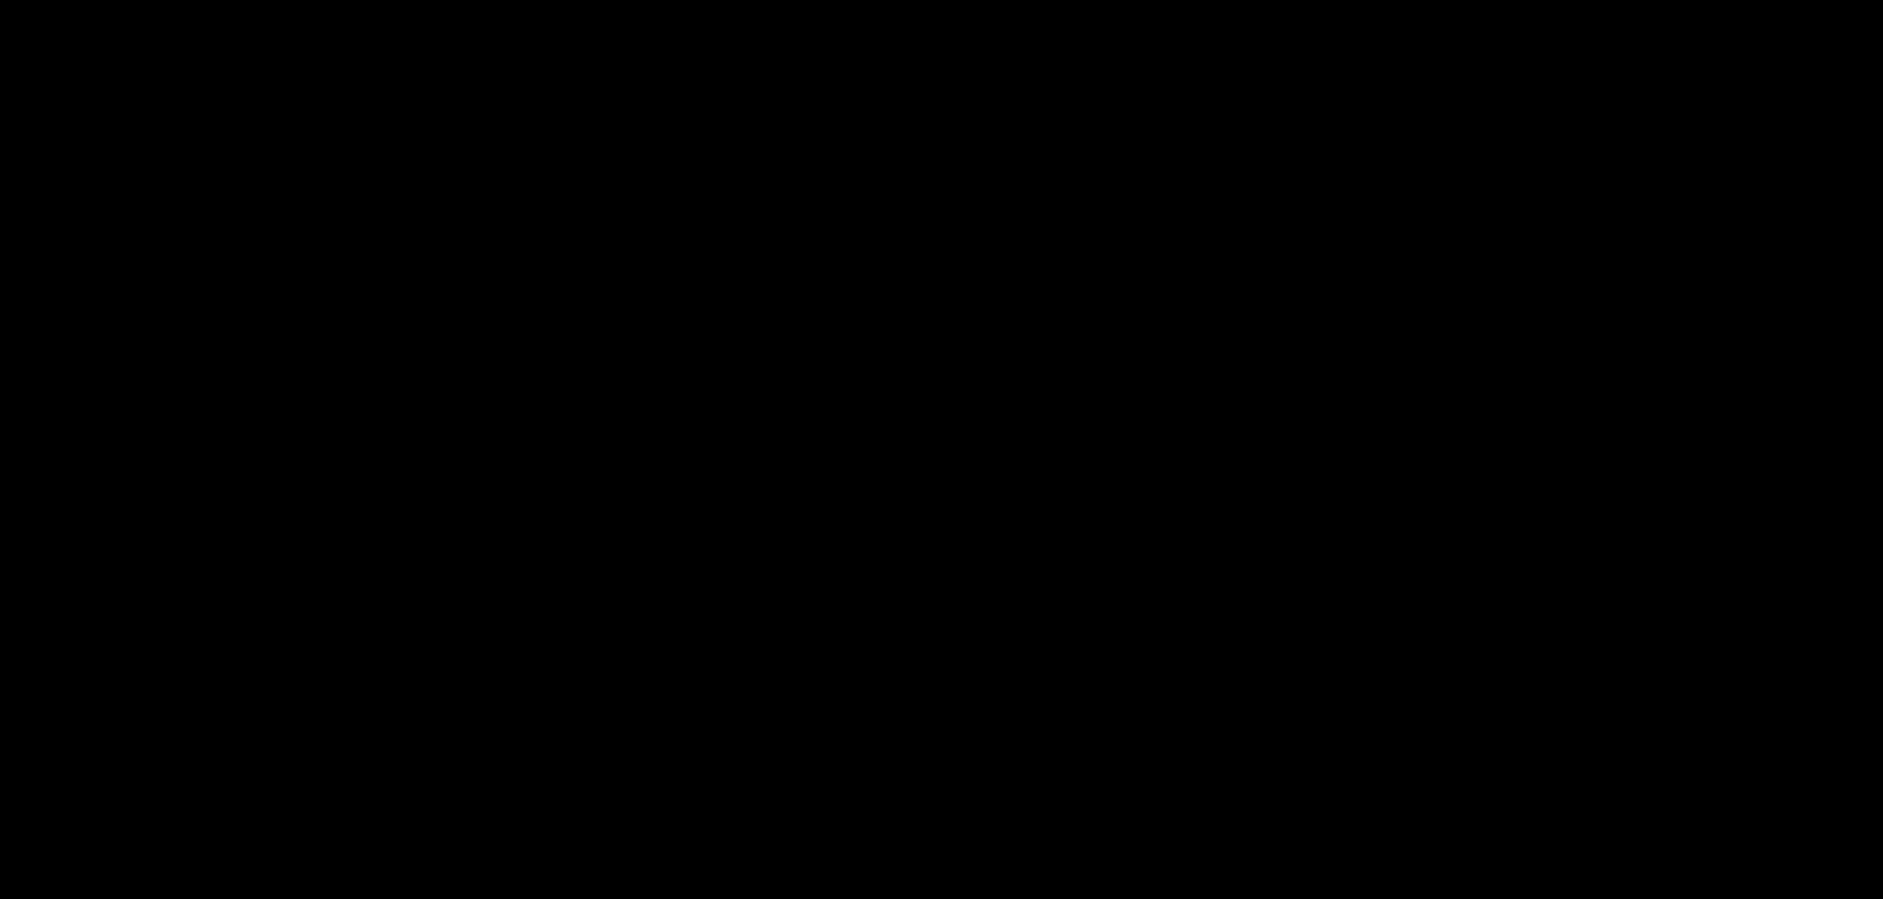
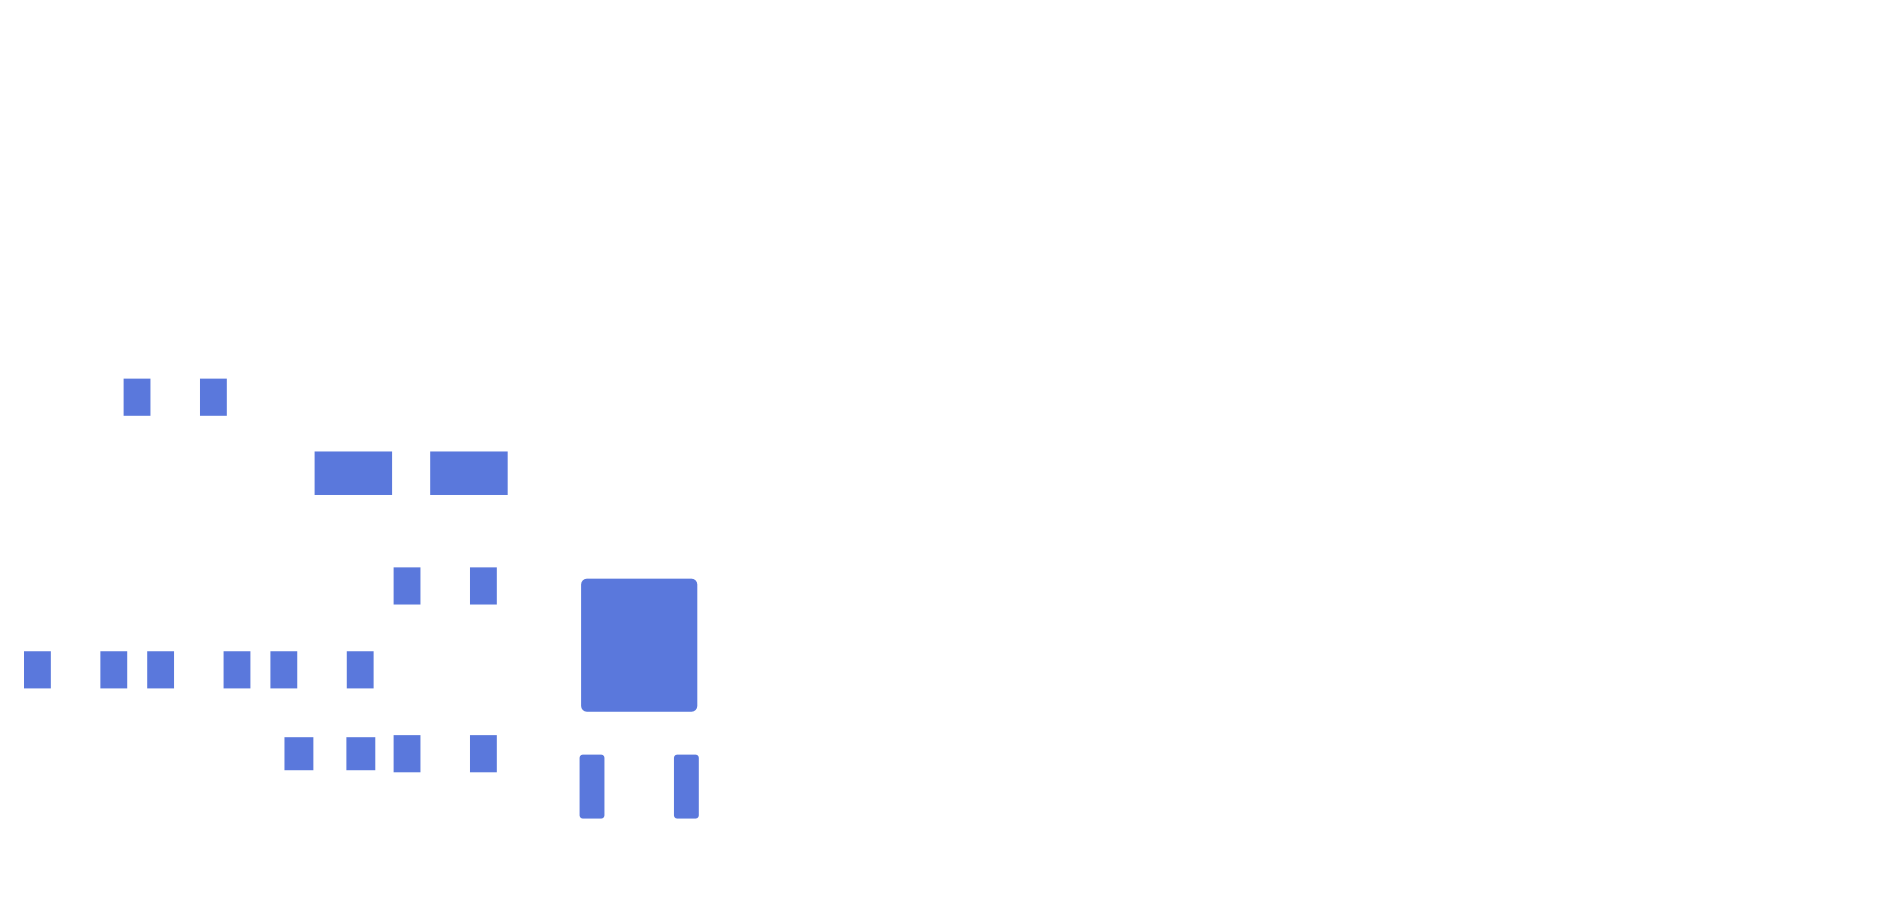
part: none -> (175, 397)
part: none -> (411, 473)
part: none -> (445, 585)
part: none -> (75, 669)
part: none -> (198, 669)
part: none -> (322, 669)
part: none -> (639, 698)
part: none -> (329, 753)
part: none -> (445, 753)

